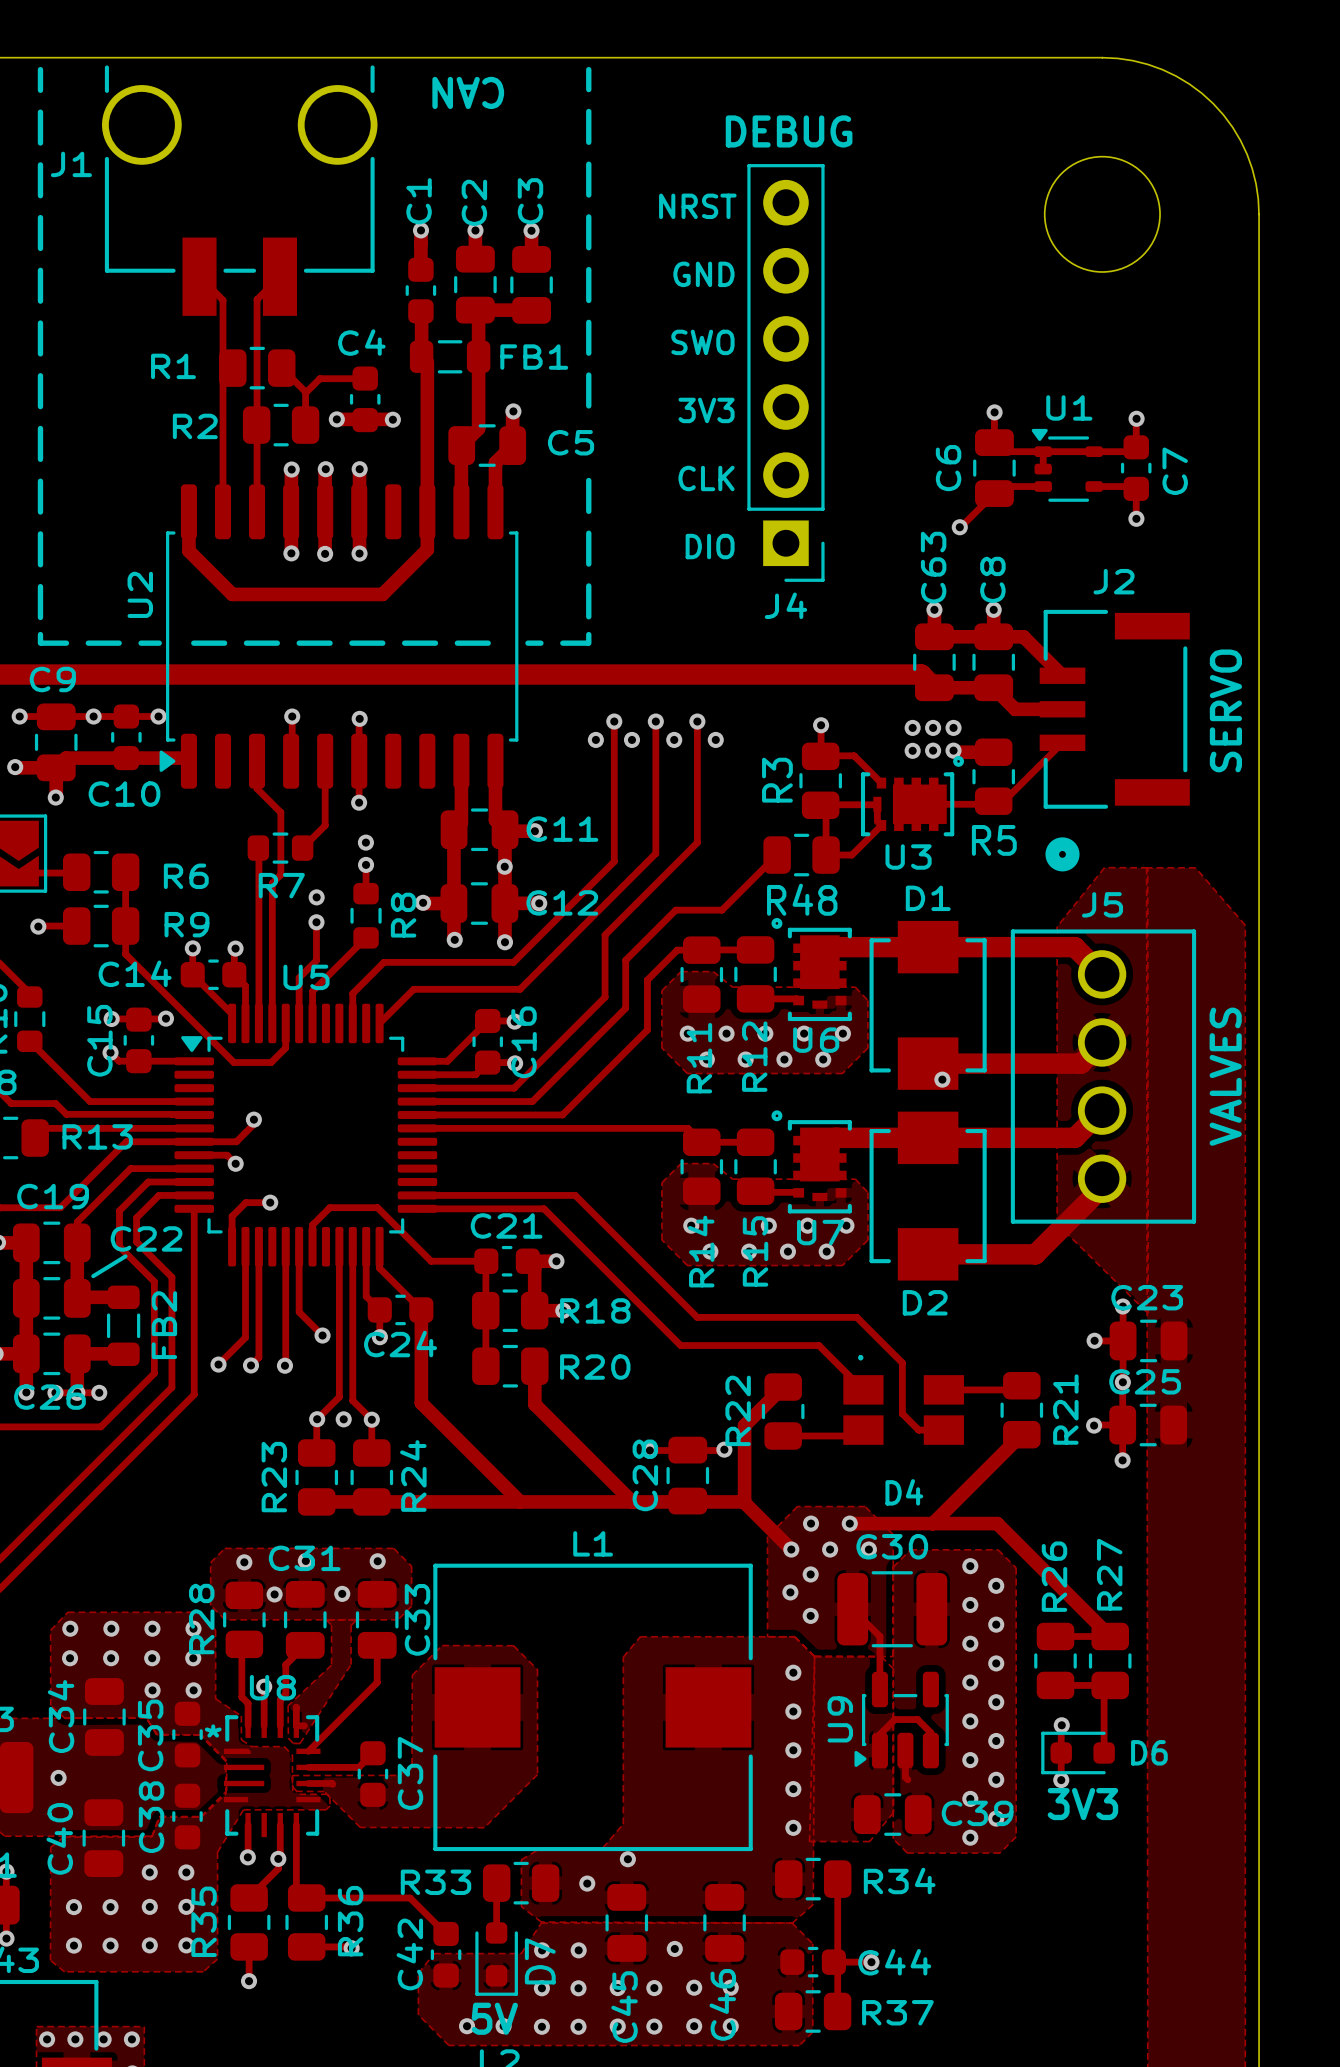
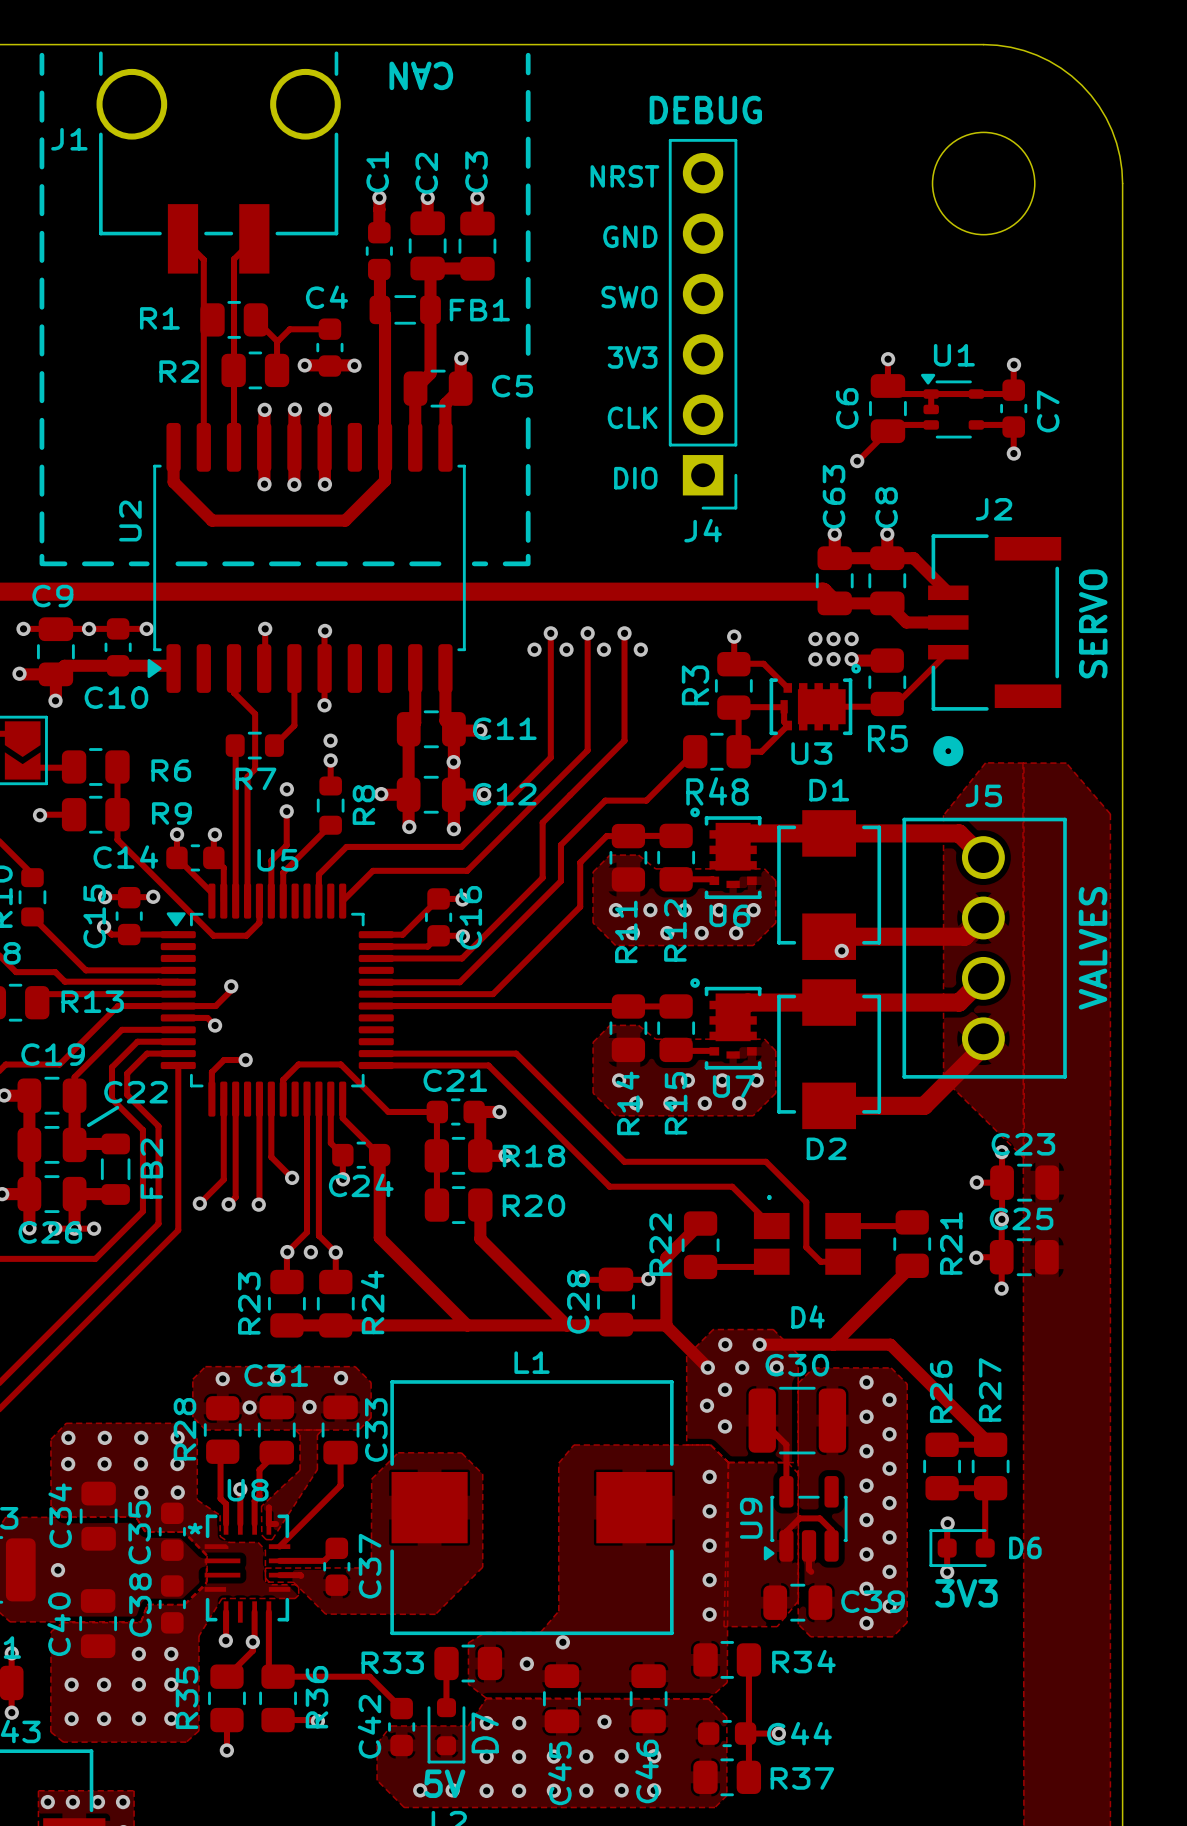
track: (625, 1000) (625, 1008) (532, 1101) (417, 1101) -> (560, 881) (459, 982)
track: (511, 1114) (562, 1114) -> (492, 994) (504, 982)
track: (549, 1128) (687, 1128) (701, 1141) -> (376, 1006) (627, 1006)

